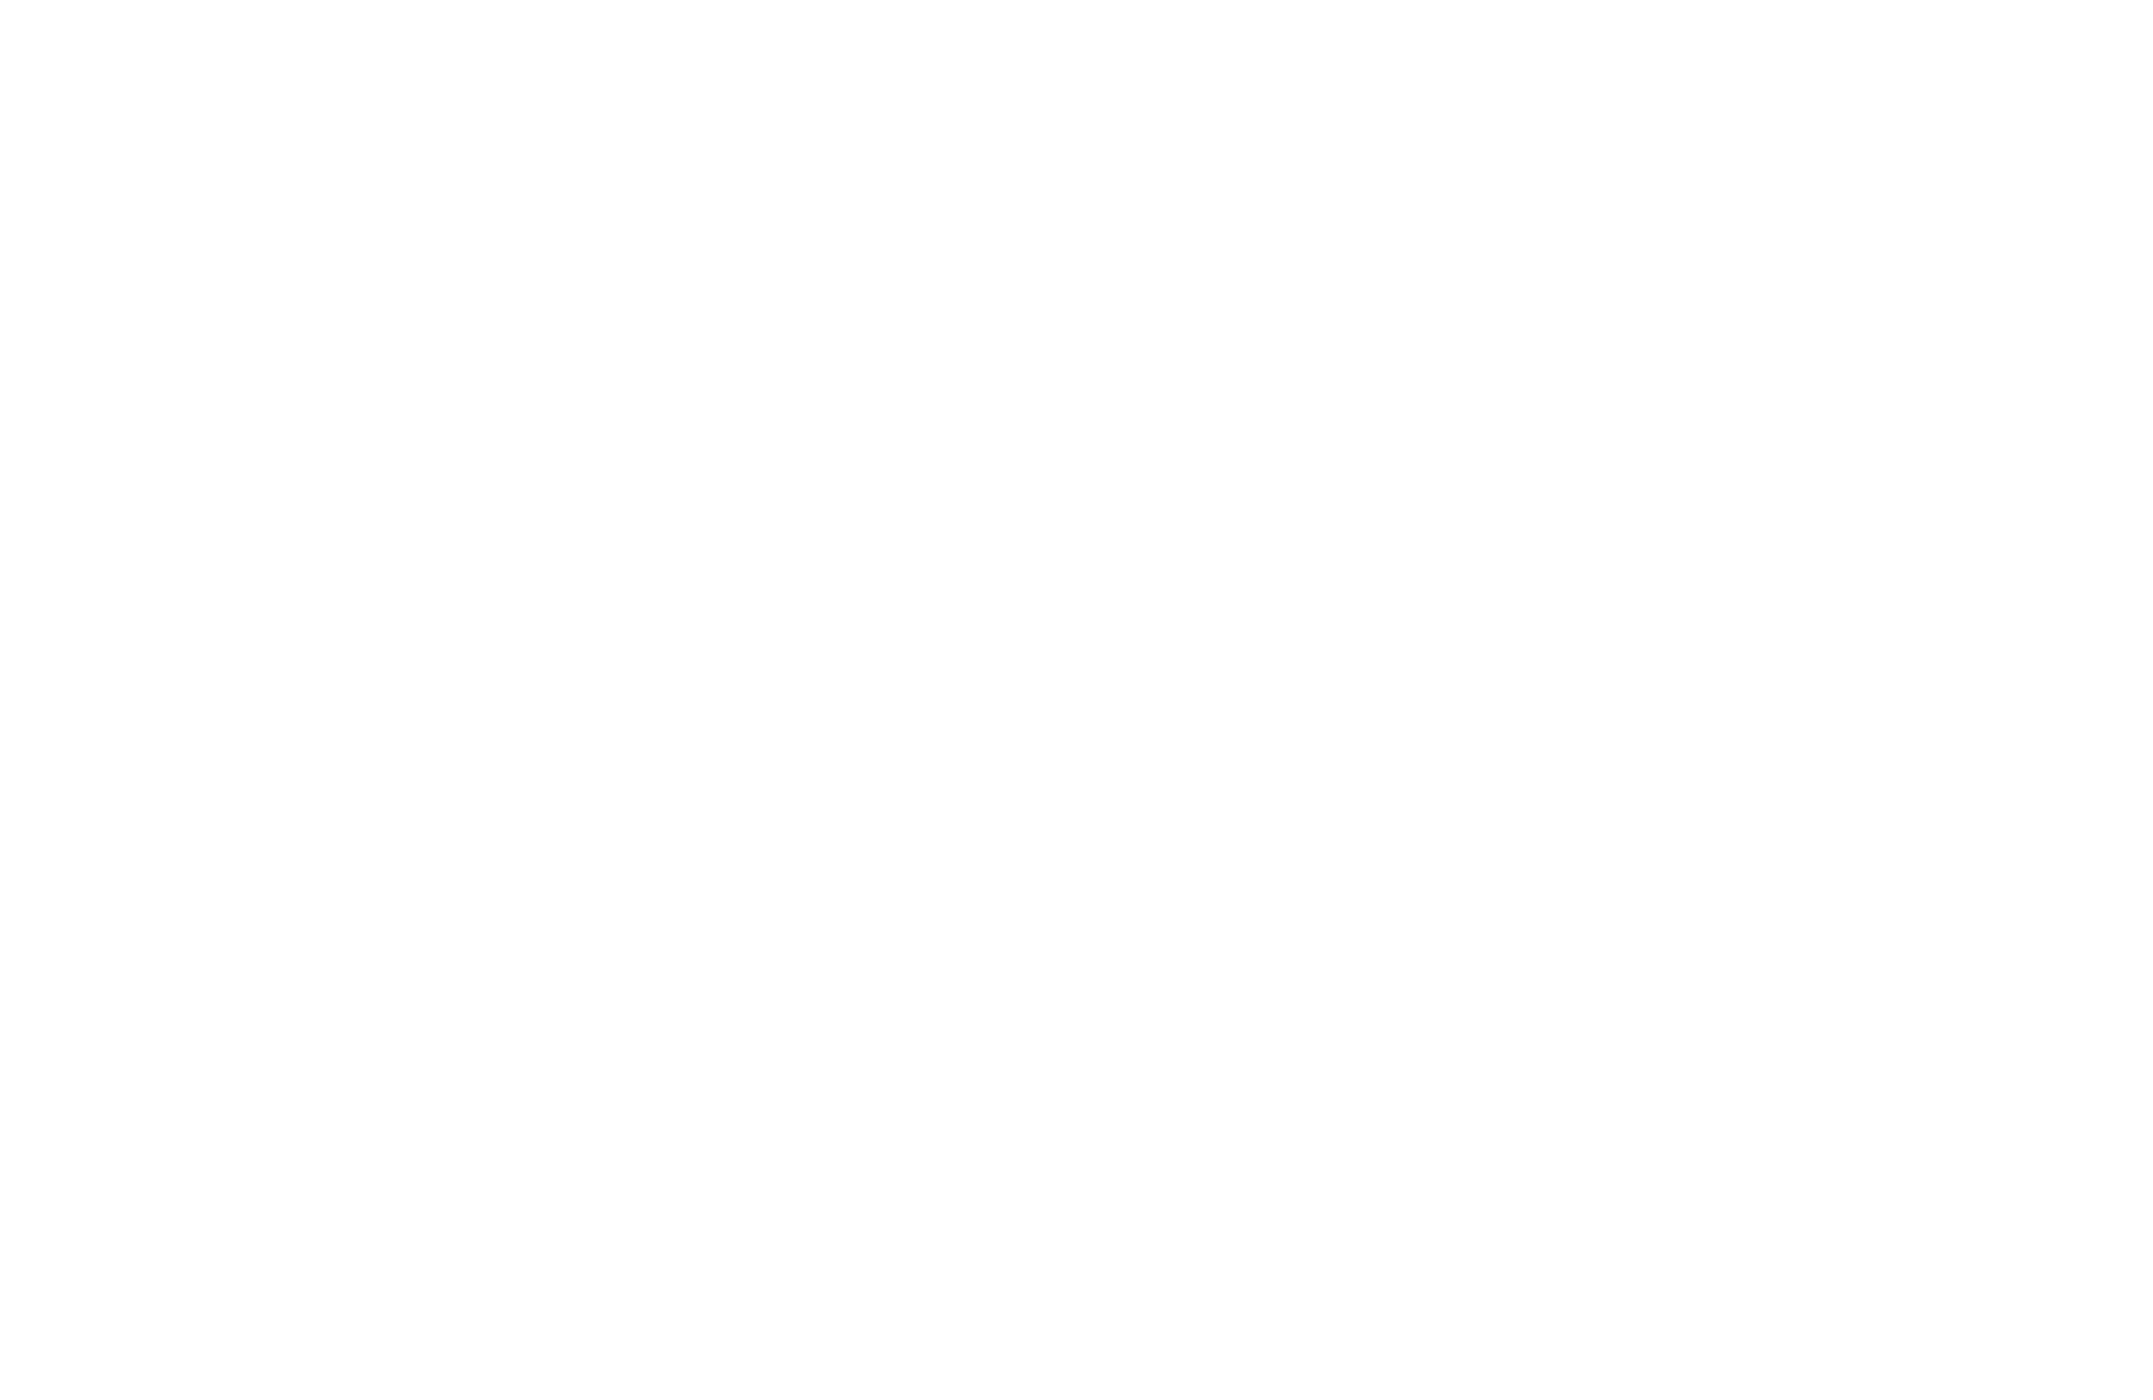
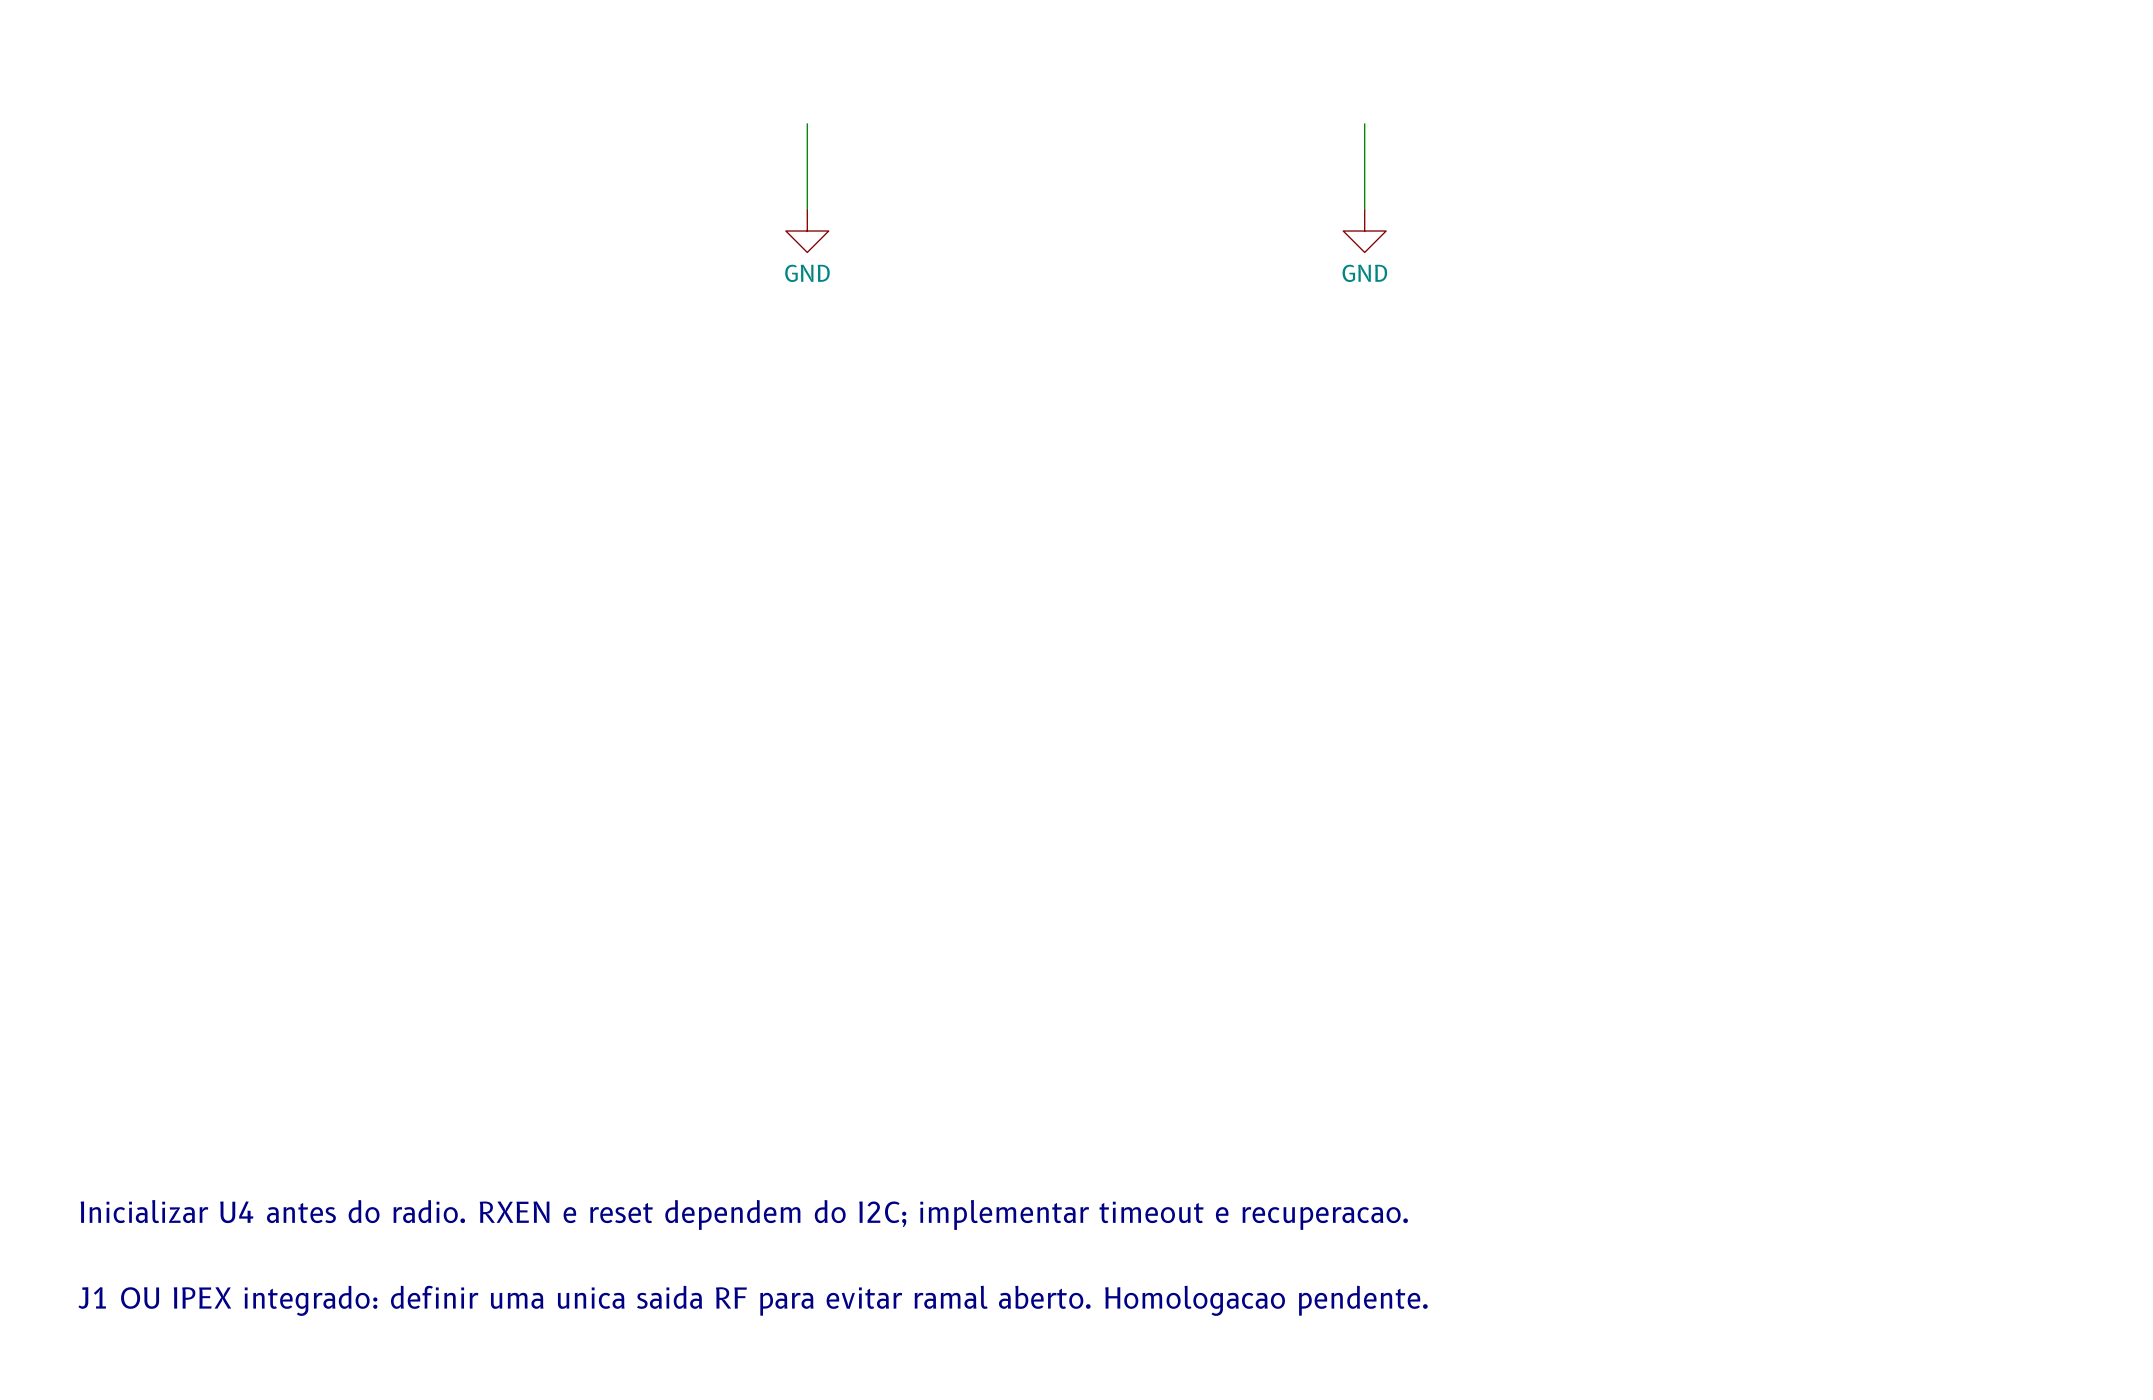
wire: none -> (807, 123) (807, 209)
wire: none -> (1364, 123) (1364, 209)
power symbol: none -> GND (807, 231)
power symbol: none -> GND (1364, 231)
text: none -> Inicializar U4 antes do radio. RXEN e reset dependem do I2C; implementar timeout e recuperacao. (744, 1214)
text: none -> J1 OU IPEX integrado: definir uma unica saida RF para evitar ramal aberto. Homologacao pendente. (753, 1300)

